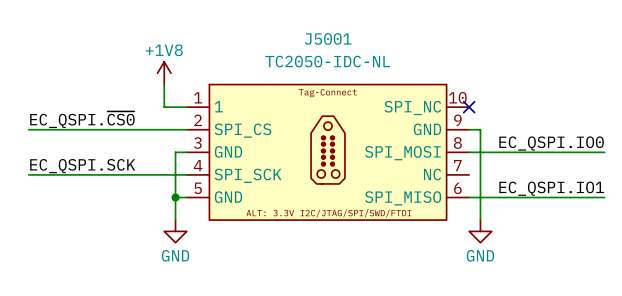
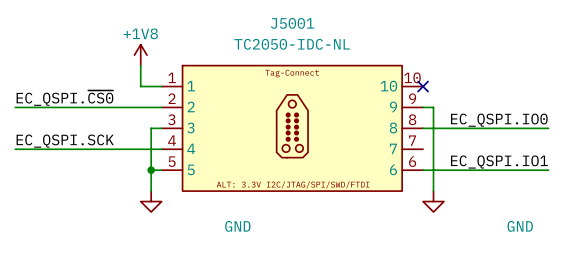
J5001 symbol: [186, 84, 470, 221] -> [161, 65, 424, 192]
power symbol text position: GND (175, 255) -> GND (237, 226)
power symbol text position: GND (480, 255) -> GND (520, 226)

